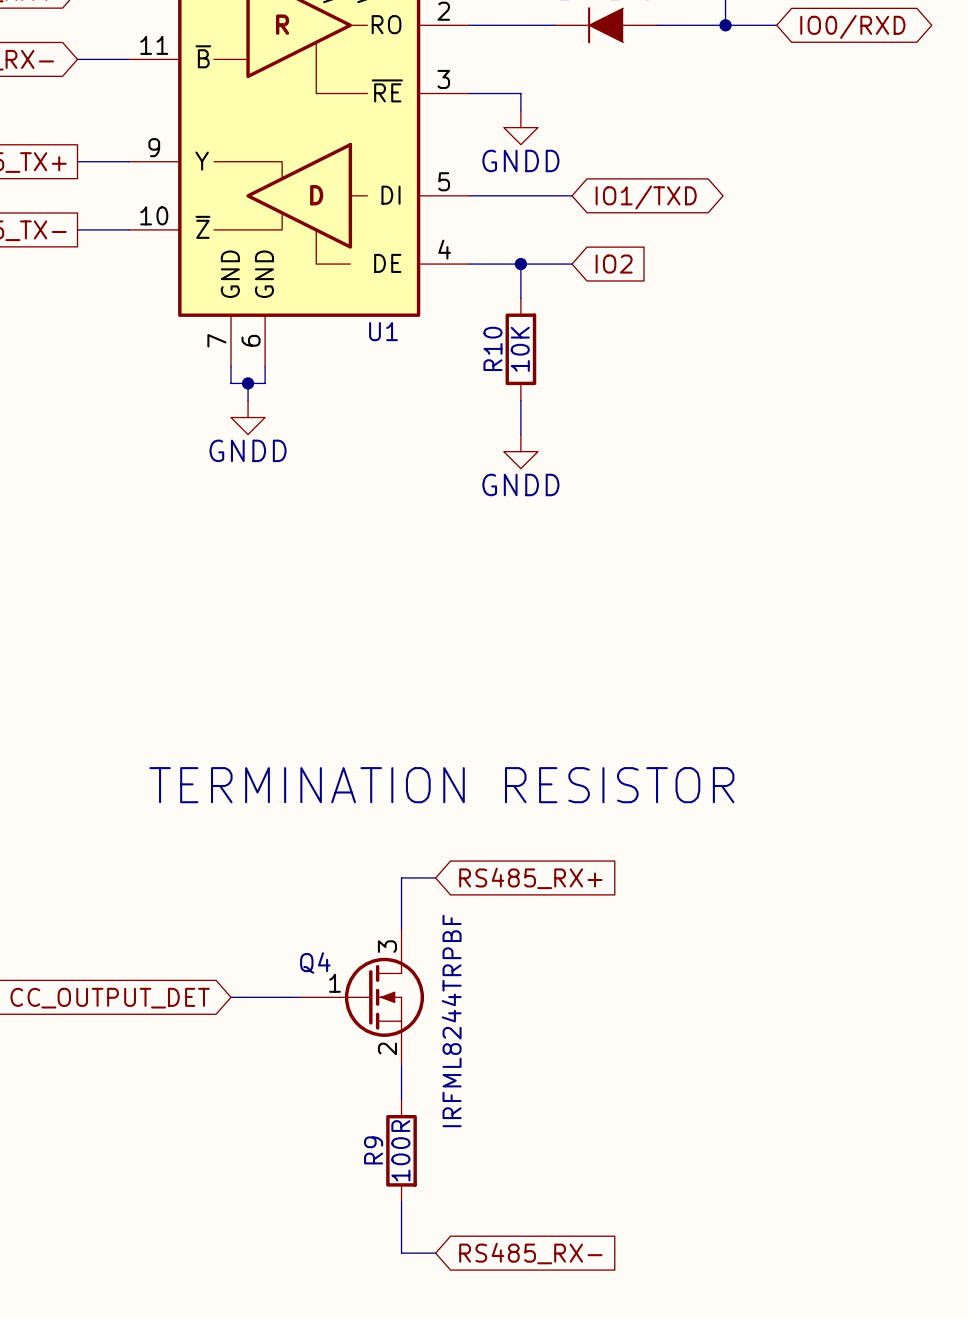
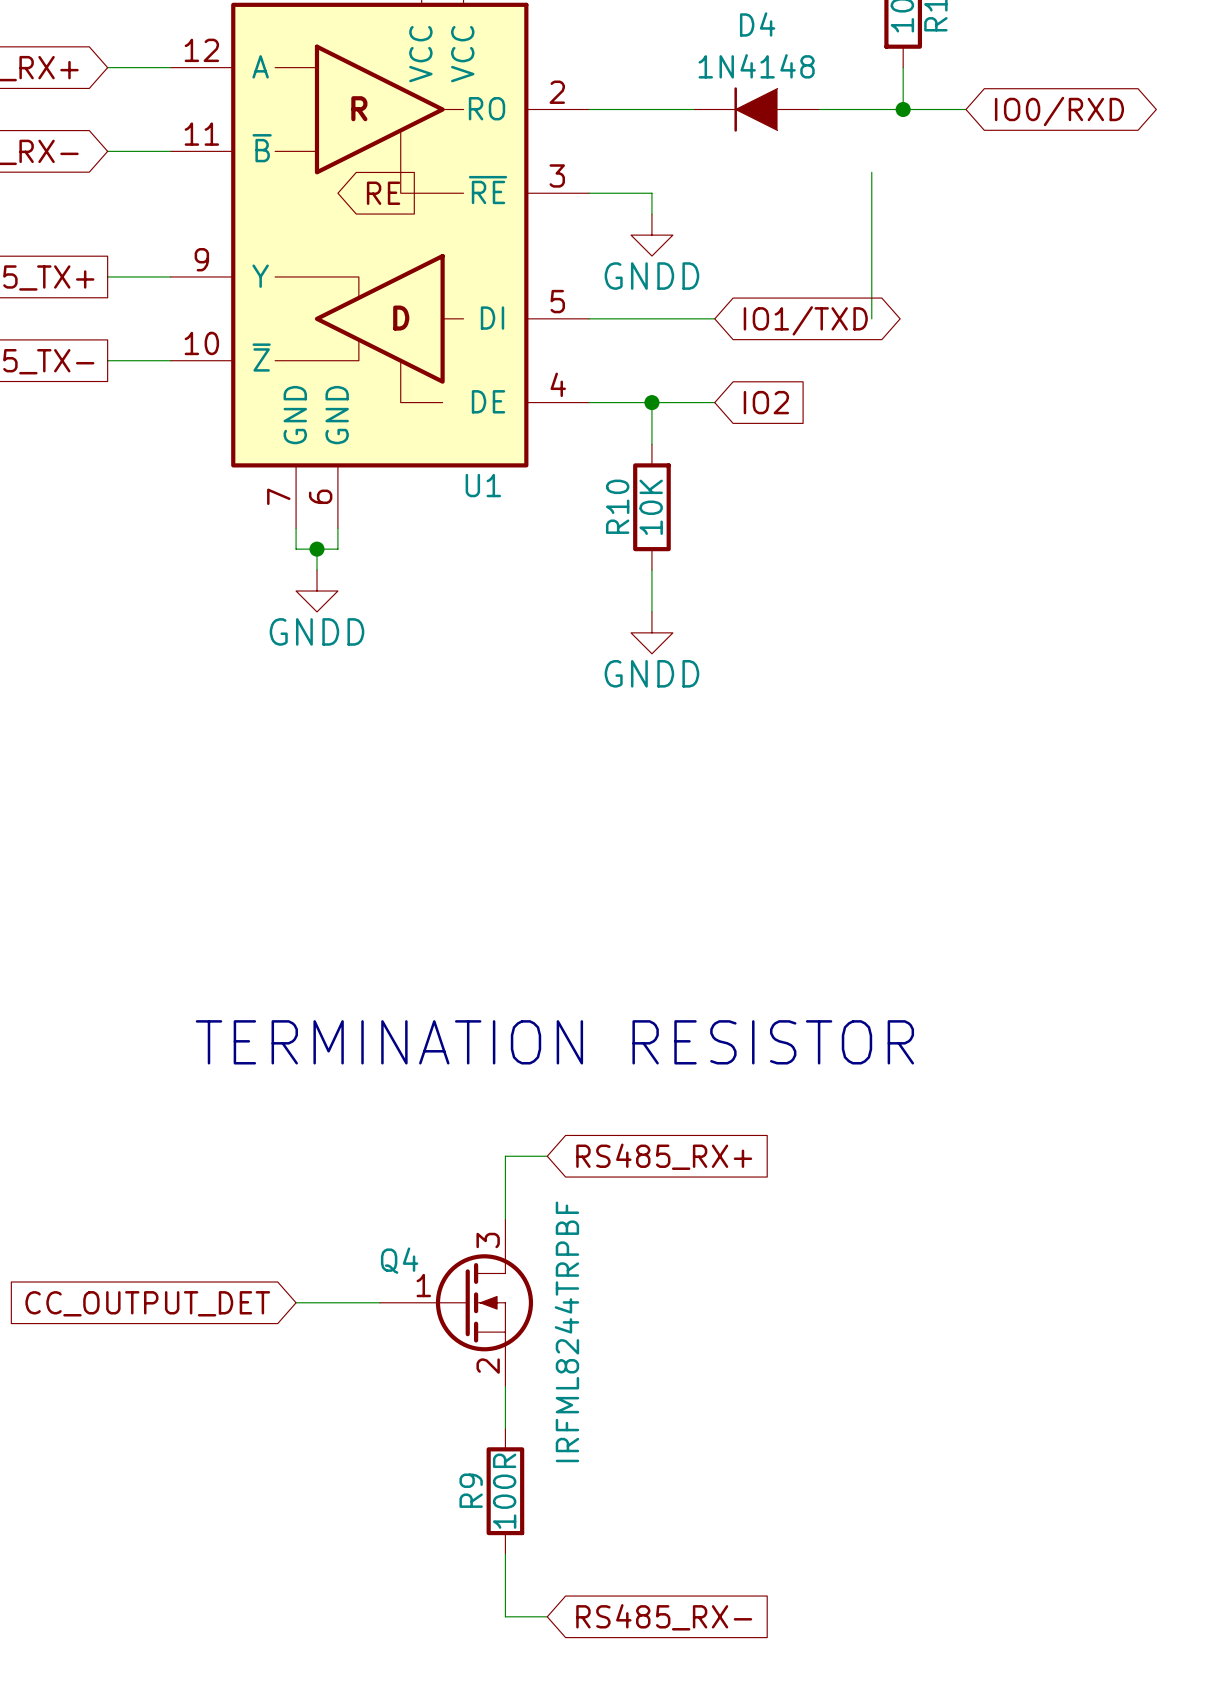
wire: none -> (871, 172) (871, 318)
global label: none -> RE (383, 193)

